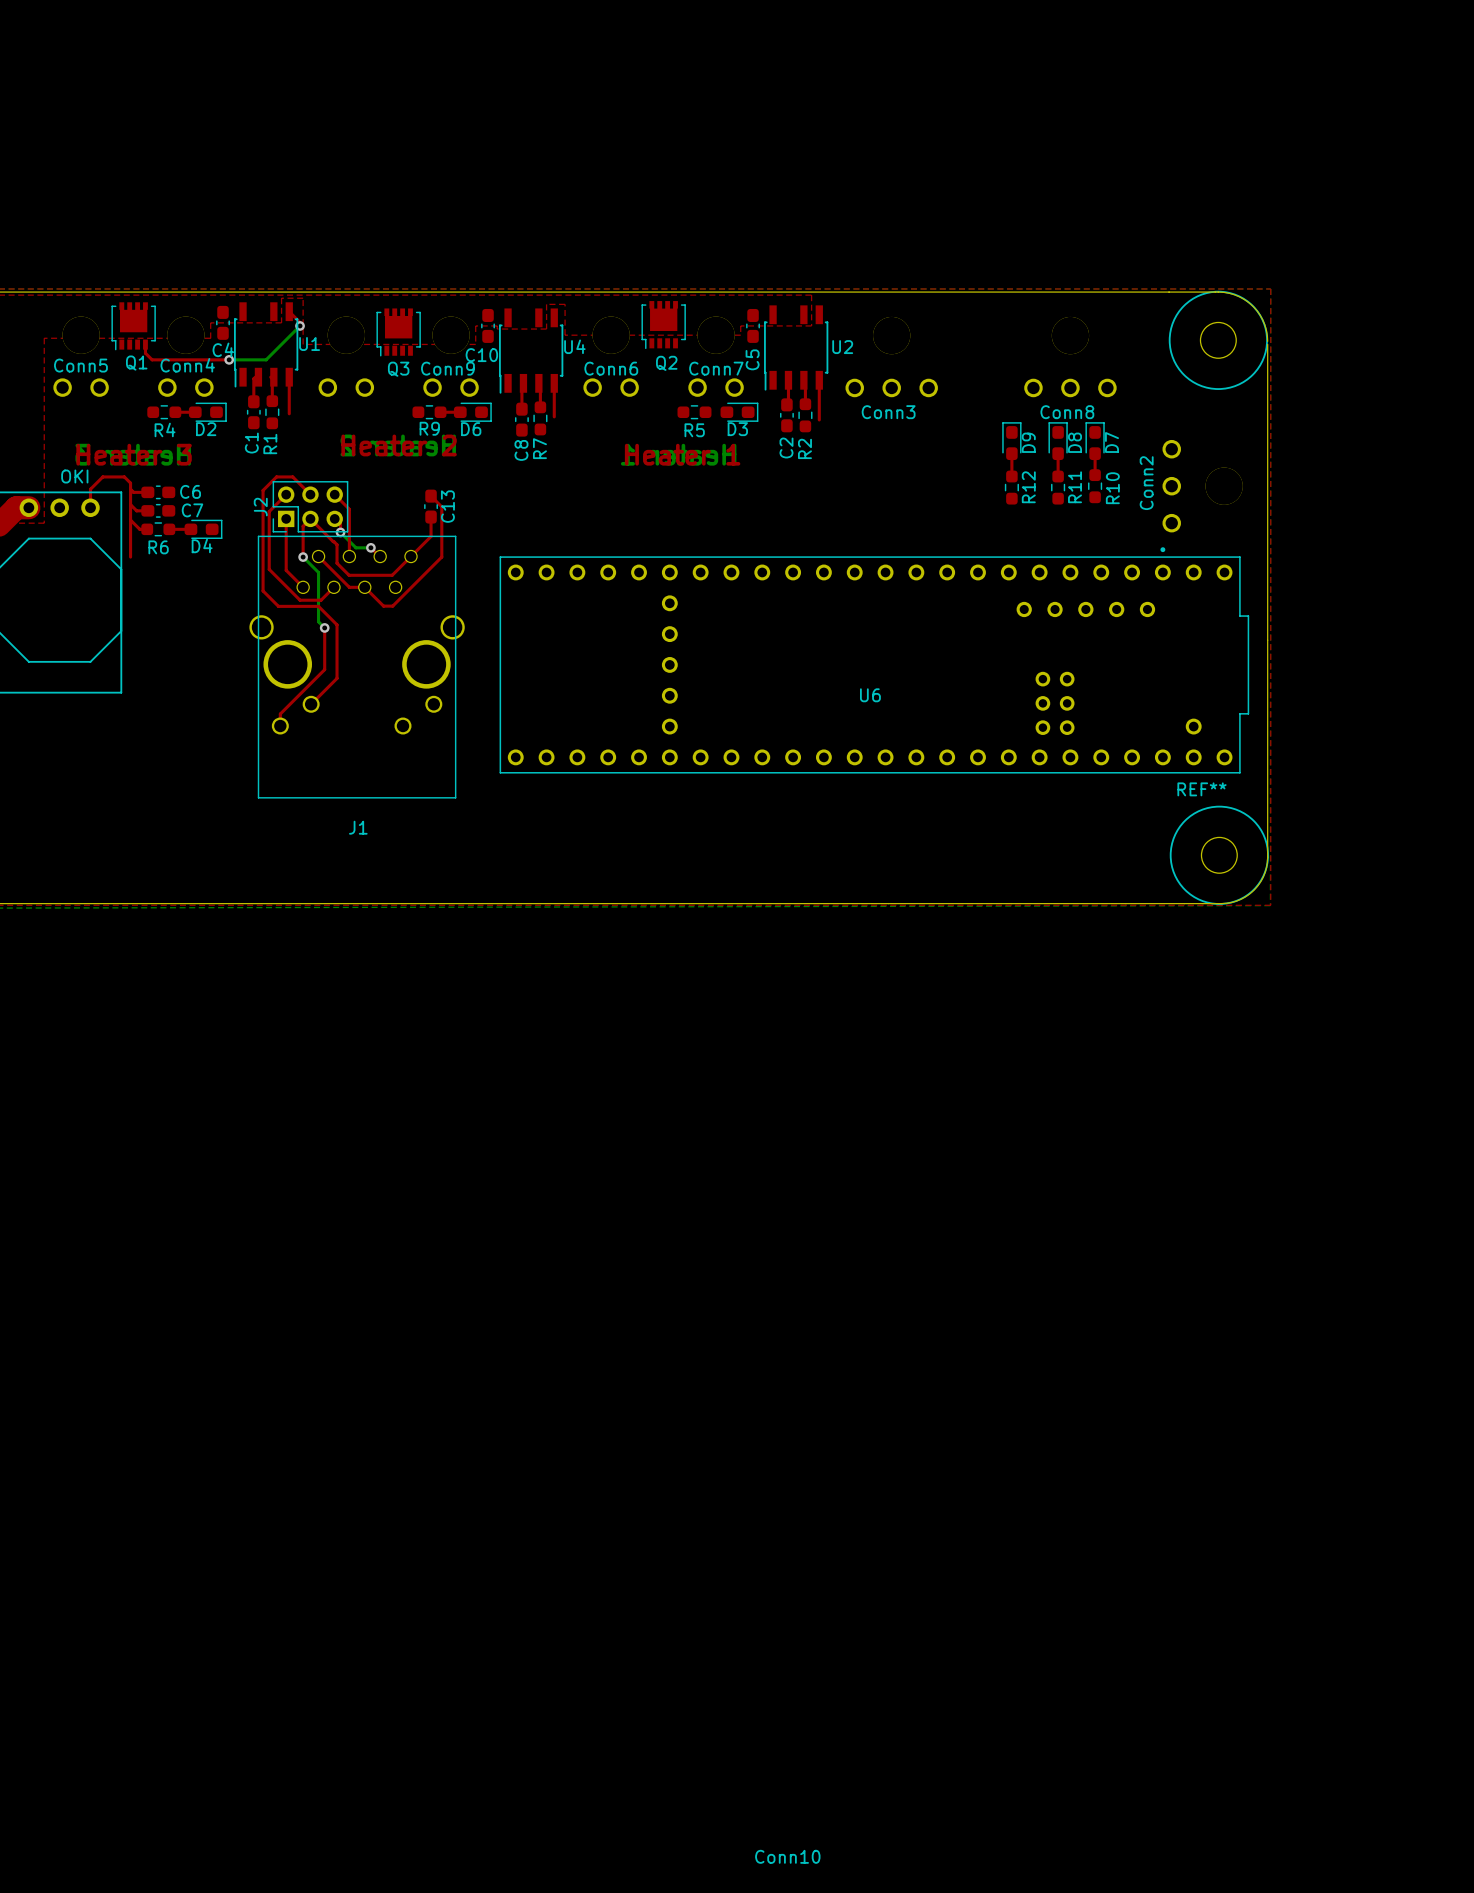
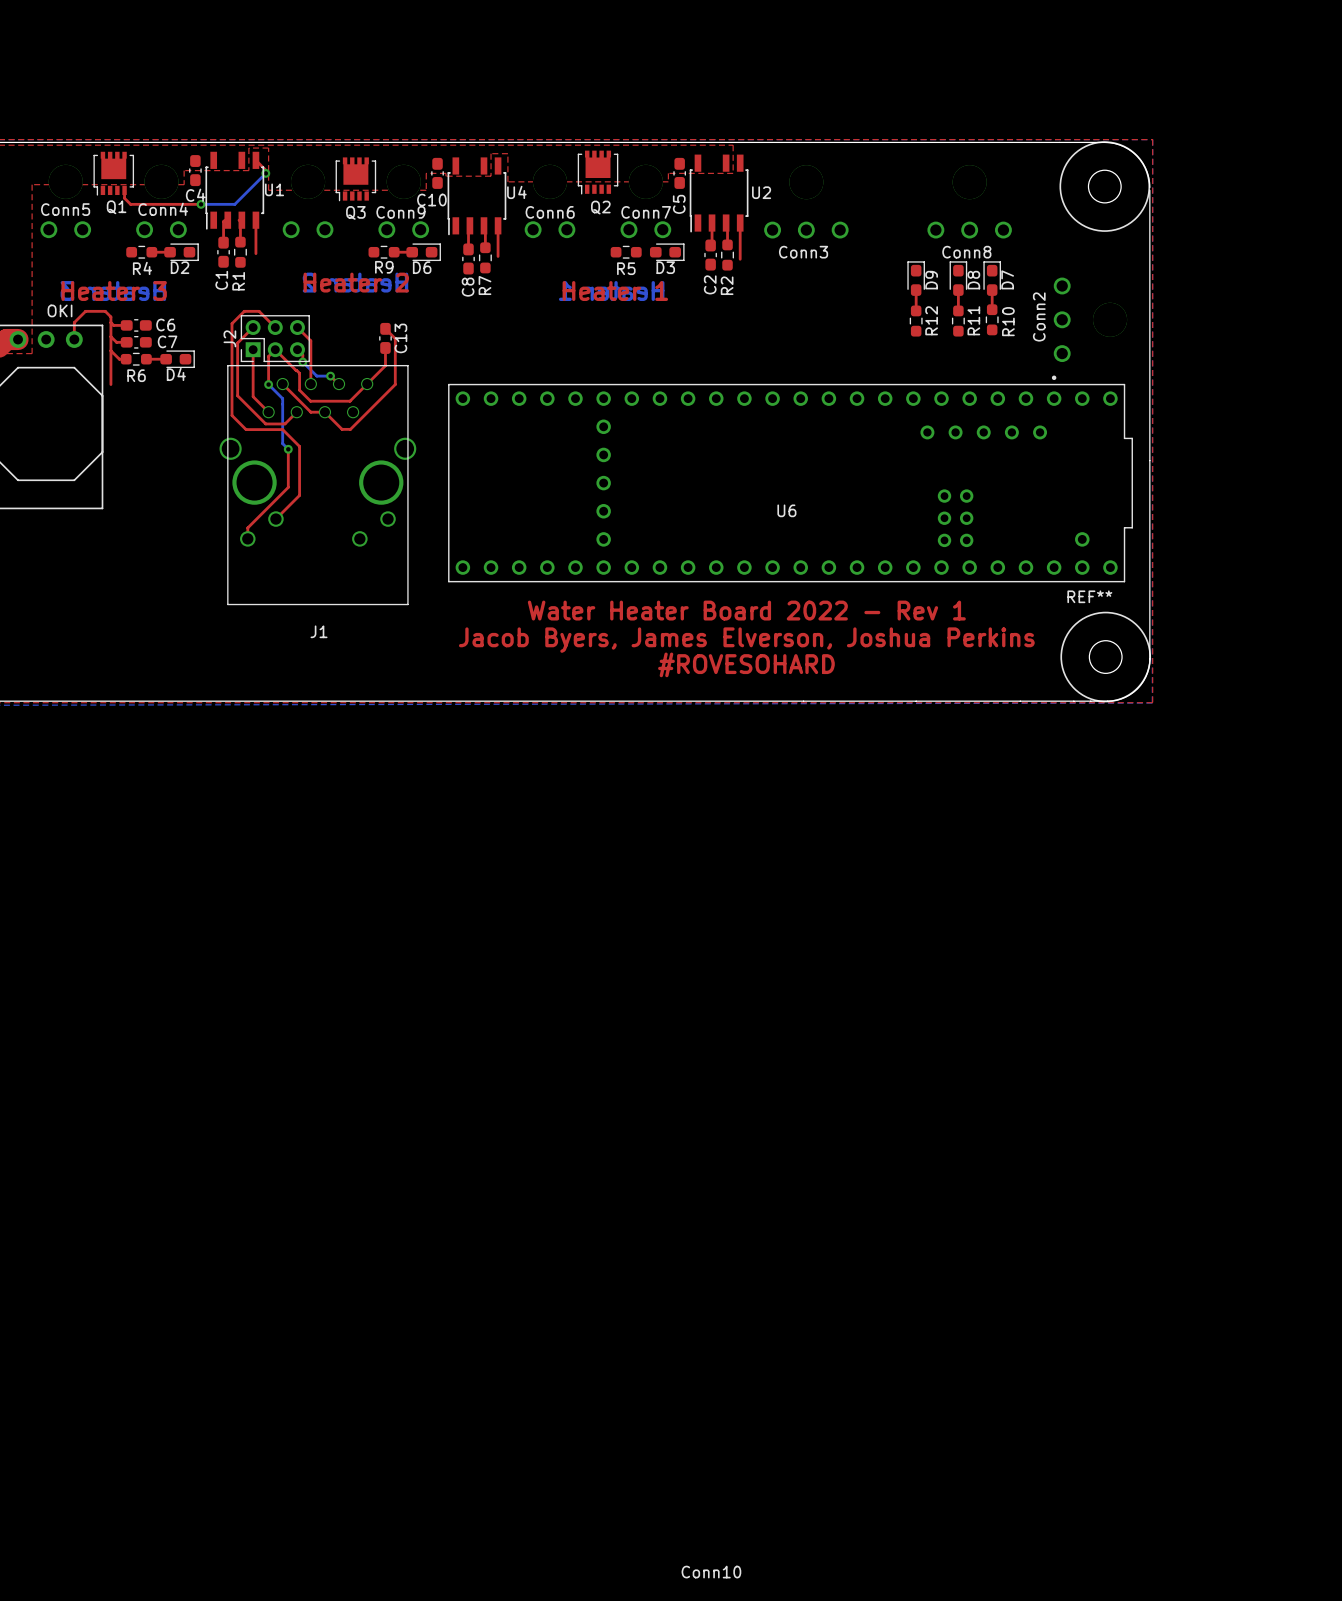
text: none -> Water Heater Board 2022 - Rev 1 (746, 610)
text: none -> Jacob Byers, James Elverson, Joshua Perkins (746, 640)
text: none -> #ROVESOHARD (746, 664)

